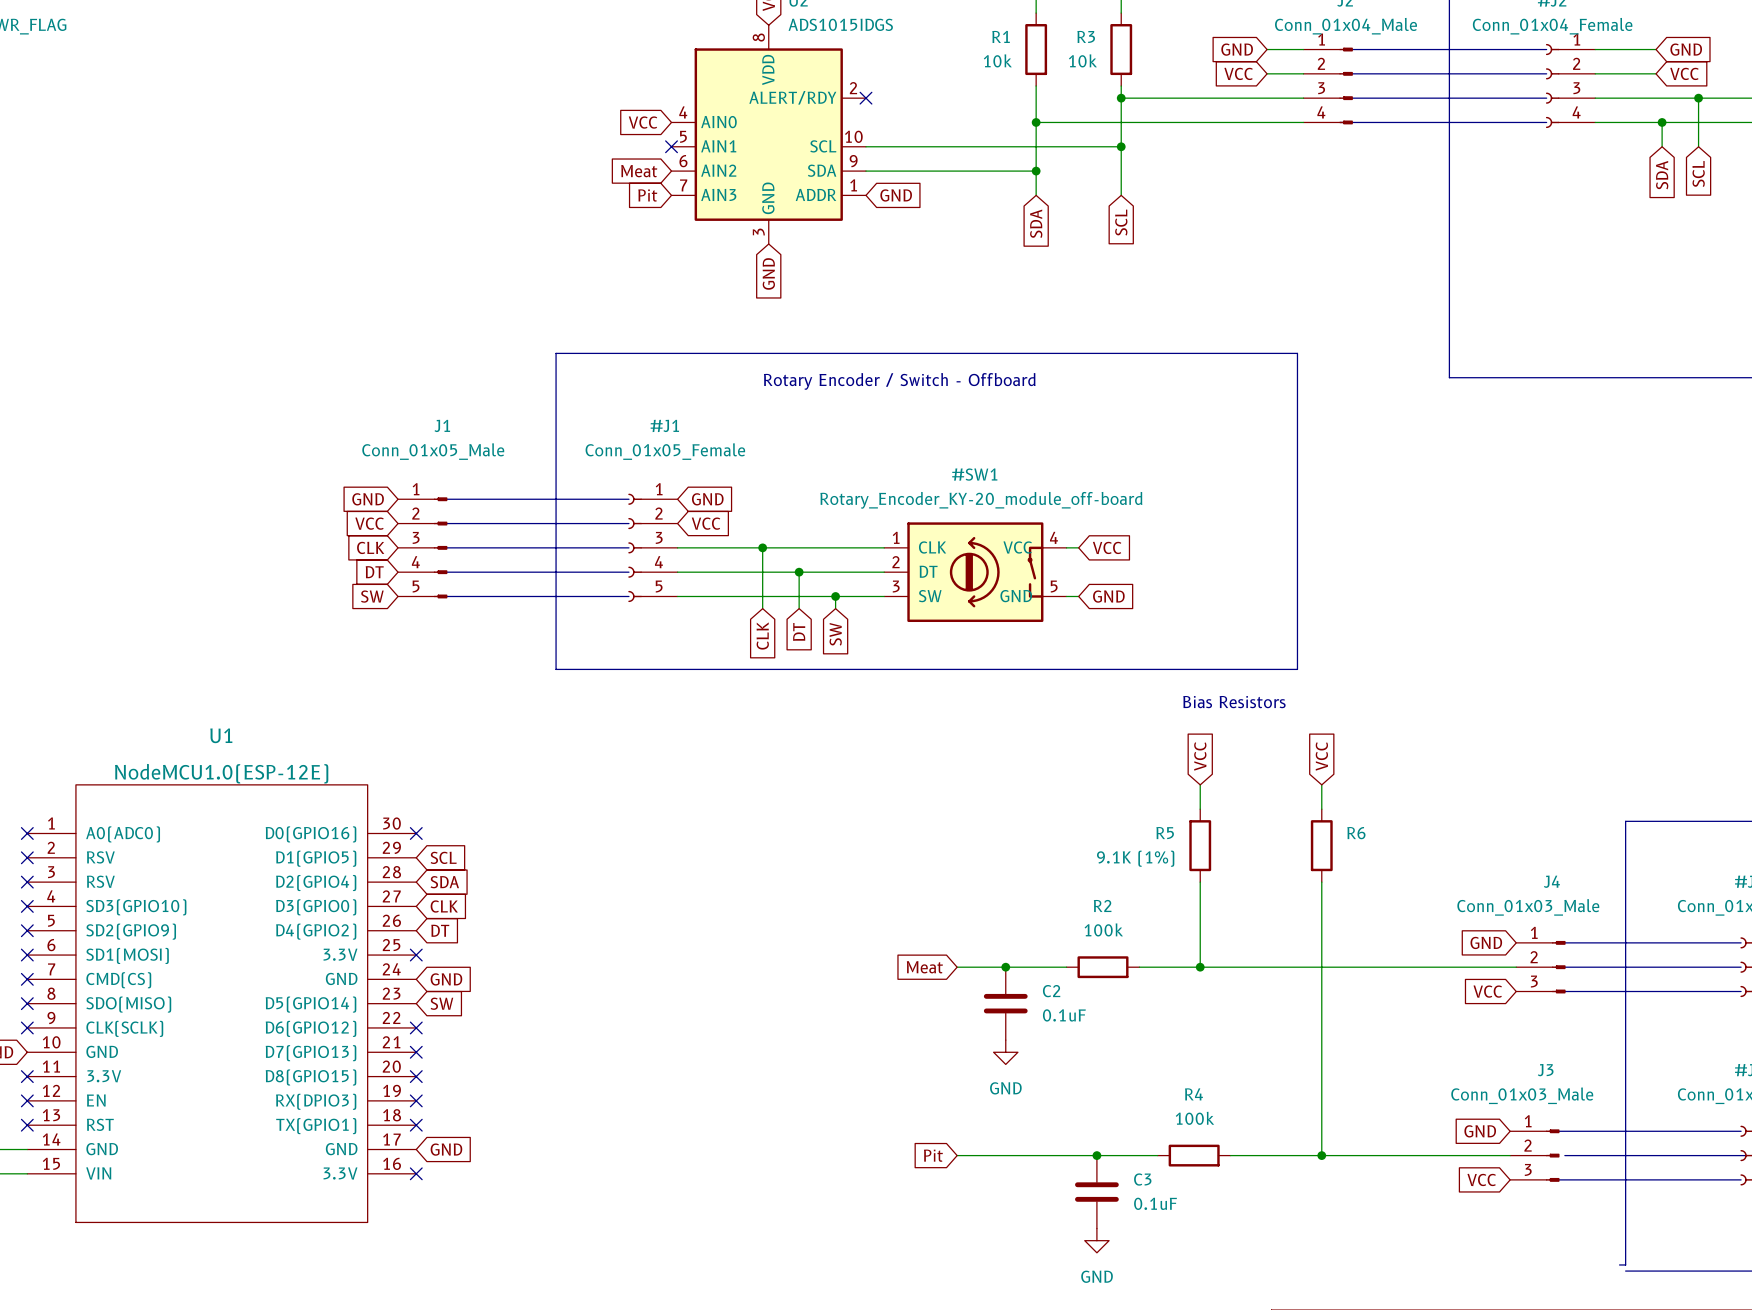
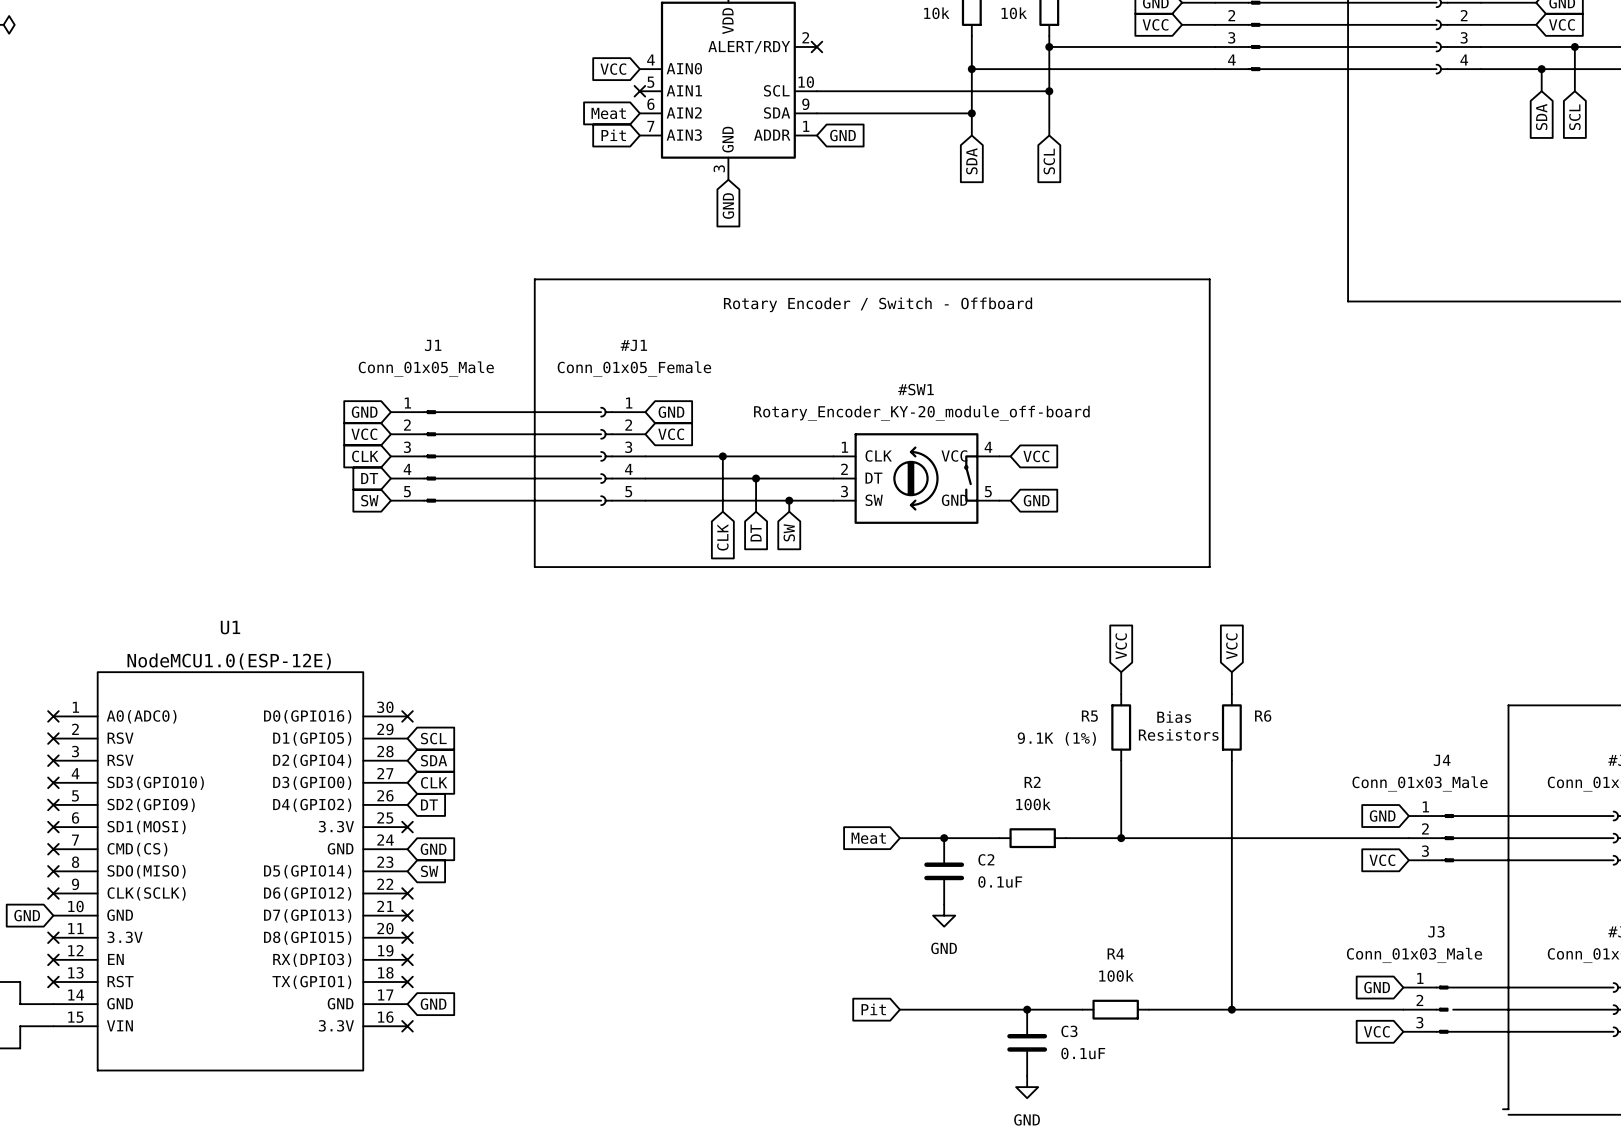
text: Bias Resistors (1234, 702) -> none
text: none -> Bias (1174, 717)
text: none -> Resistors (1178, 734)

